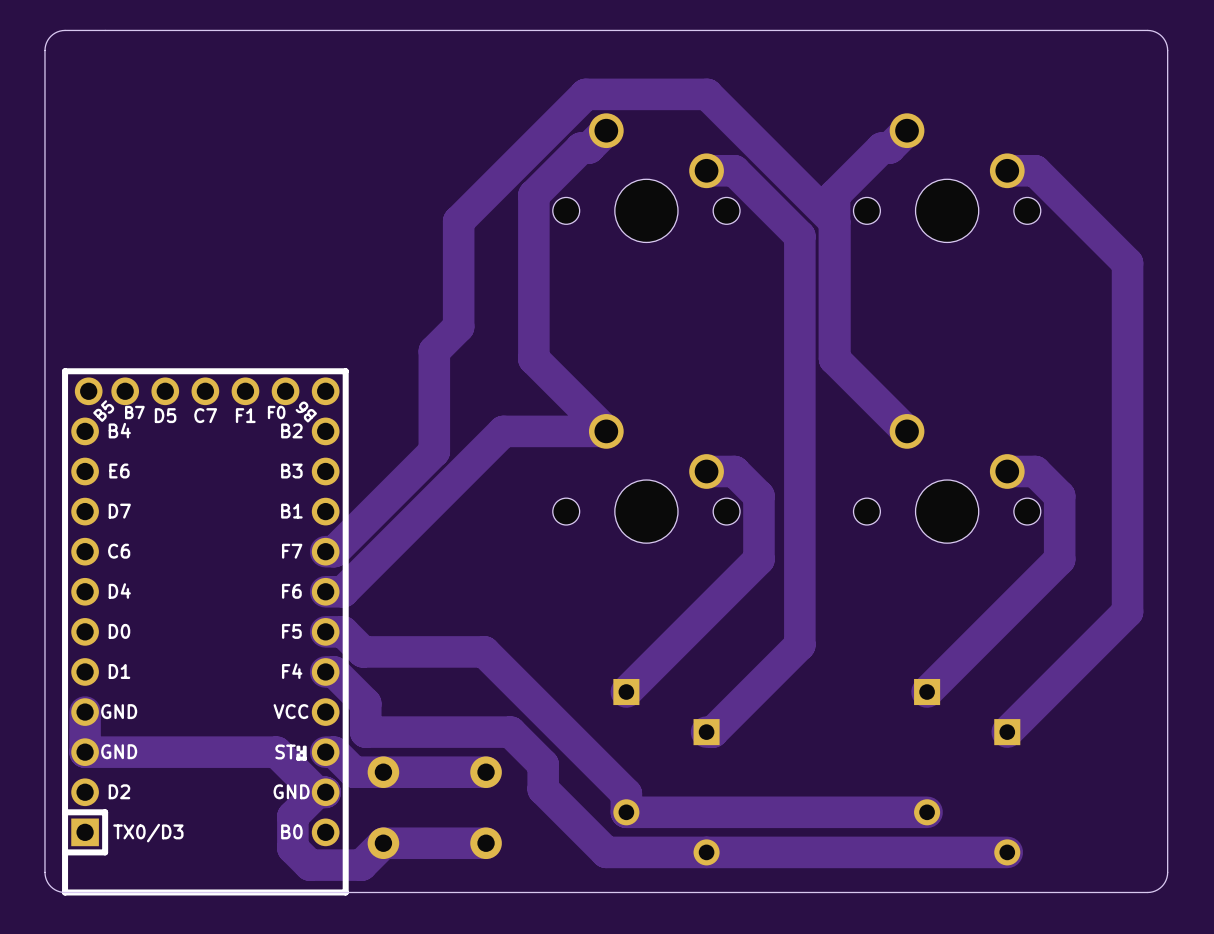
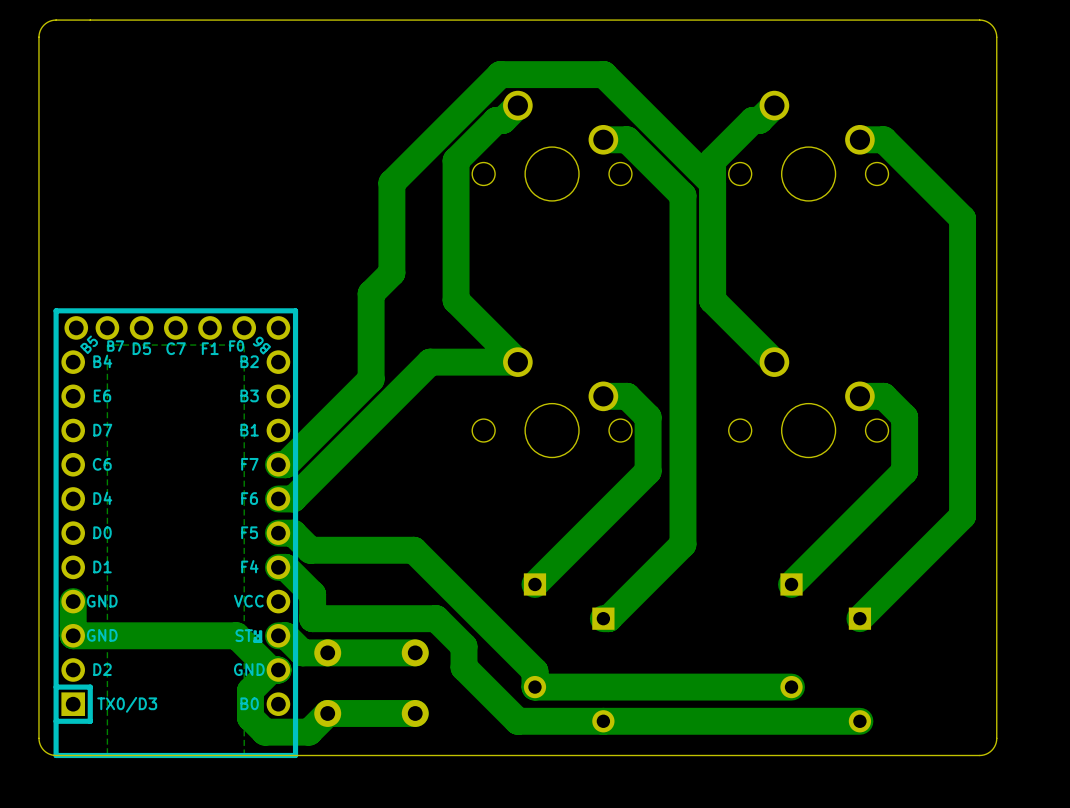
zone outline: none -> (244, 345) (244, 755) (107, 755) (107, 345) (244, 345)

